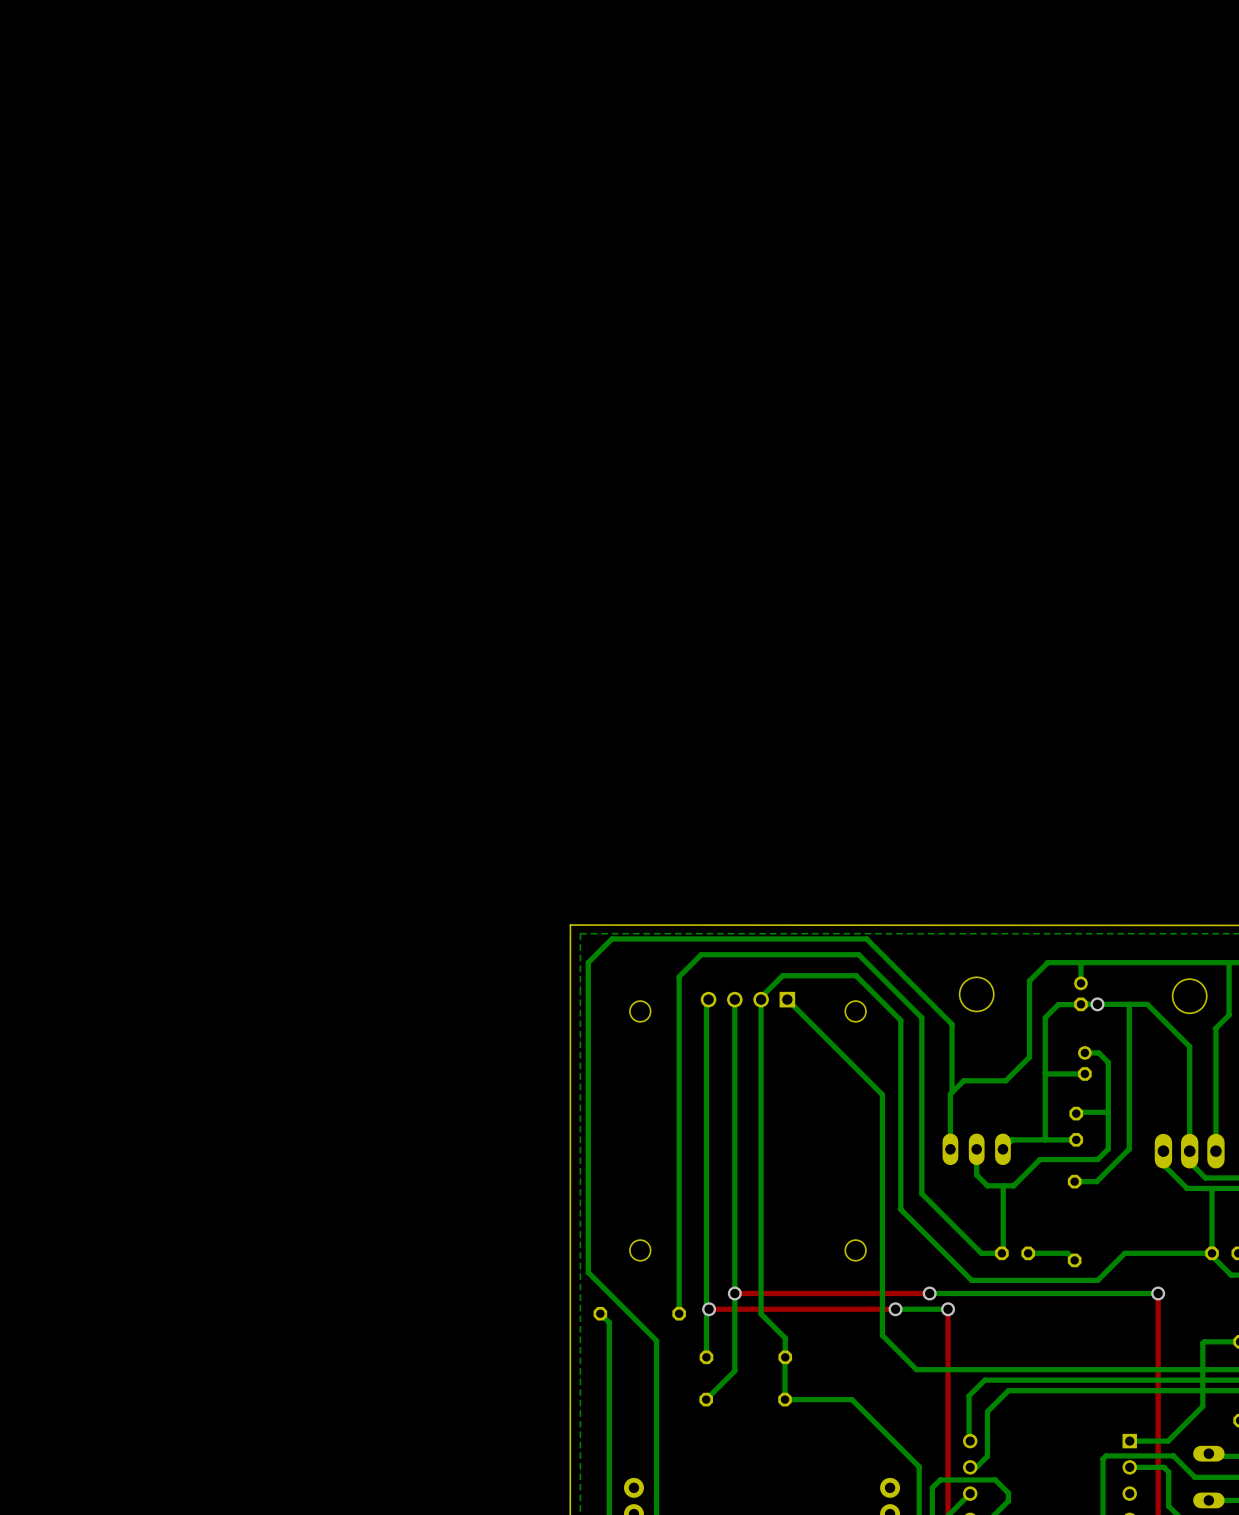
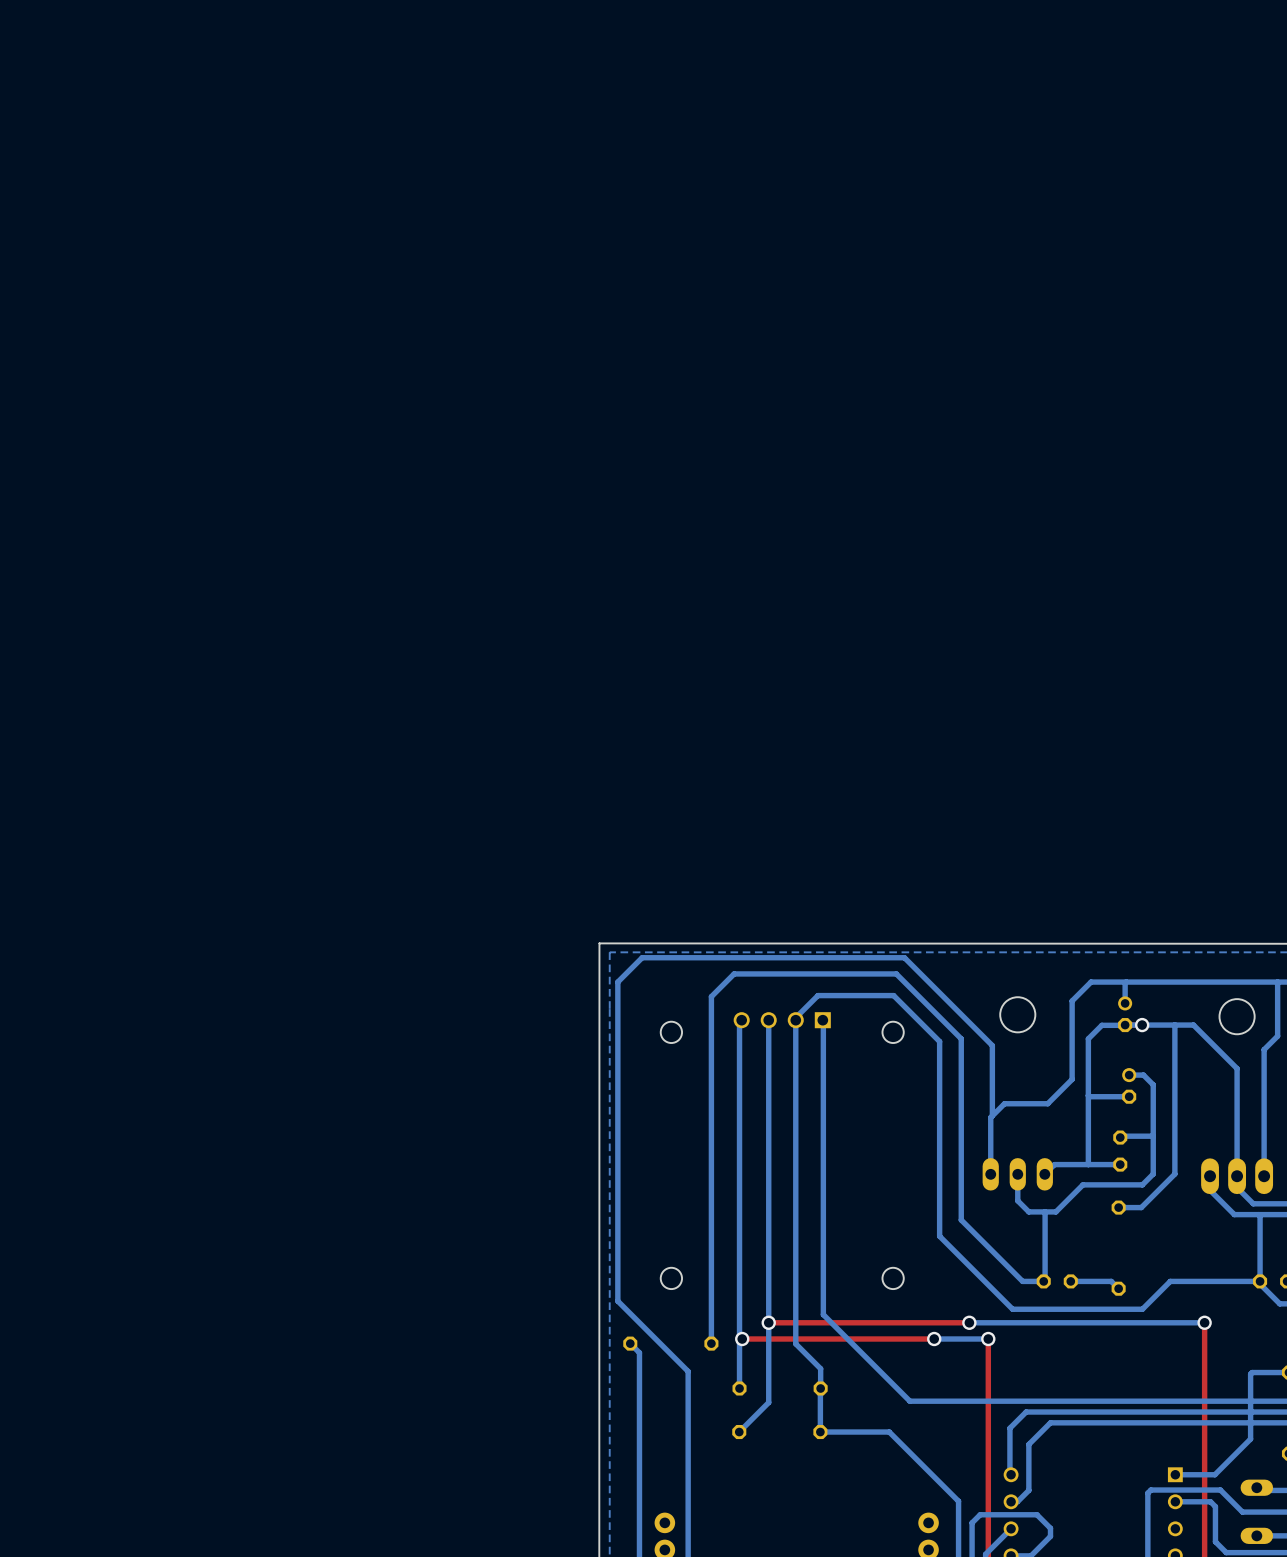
bottom track: (787, 1000) (882, 1094) (882, 1335) (916, 1369) -> (823, 1020) (823, 1314) (909, 1401) (955, 1401)

